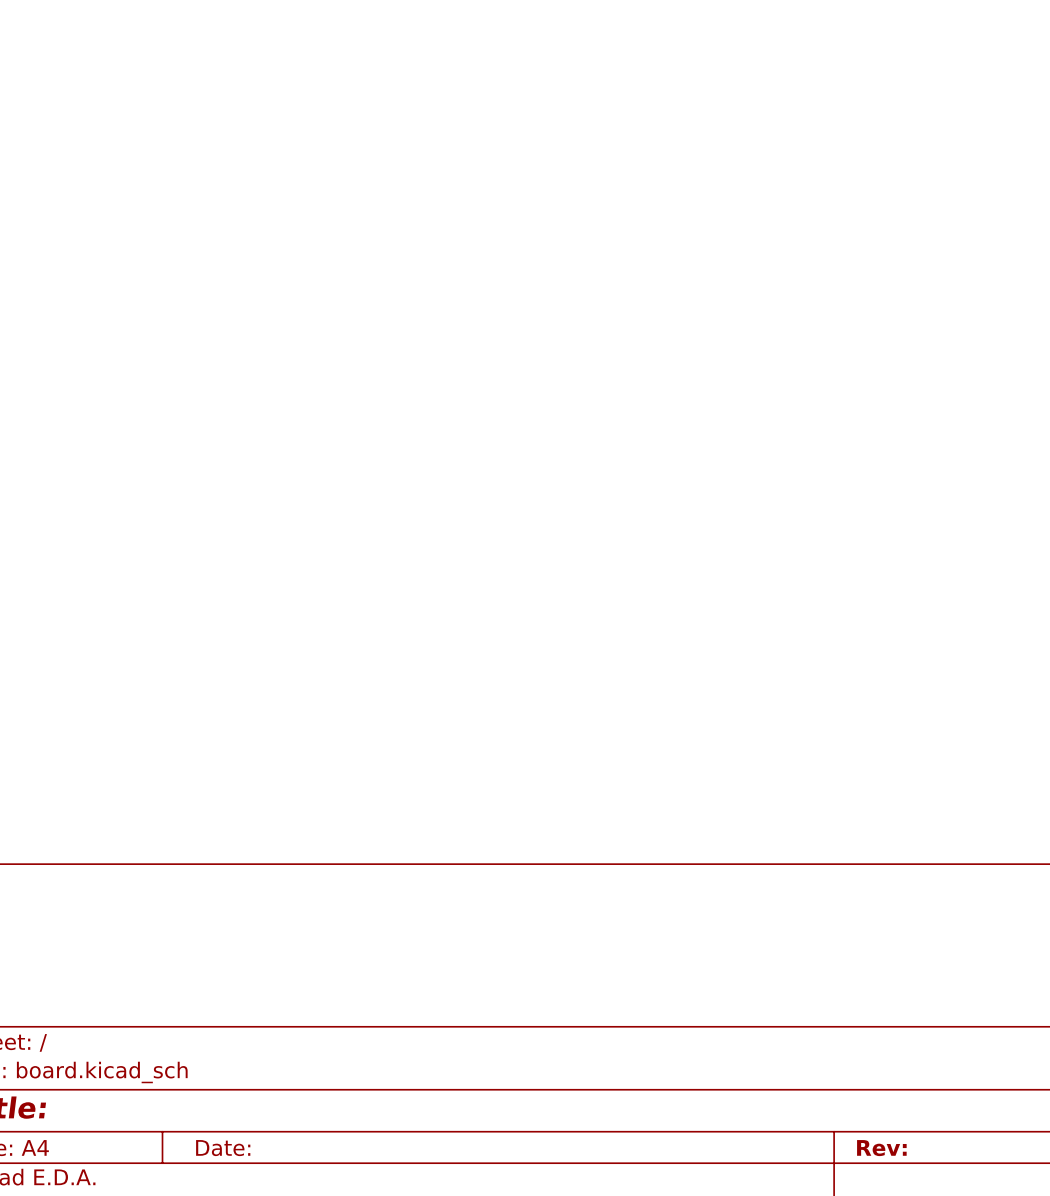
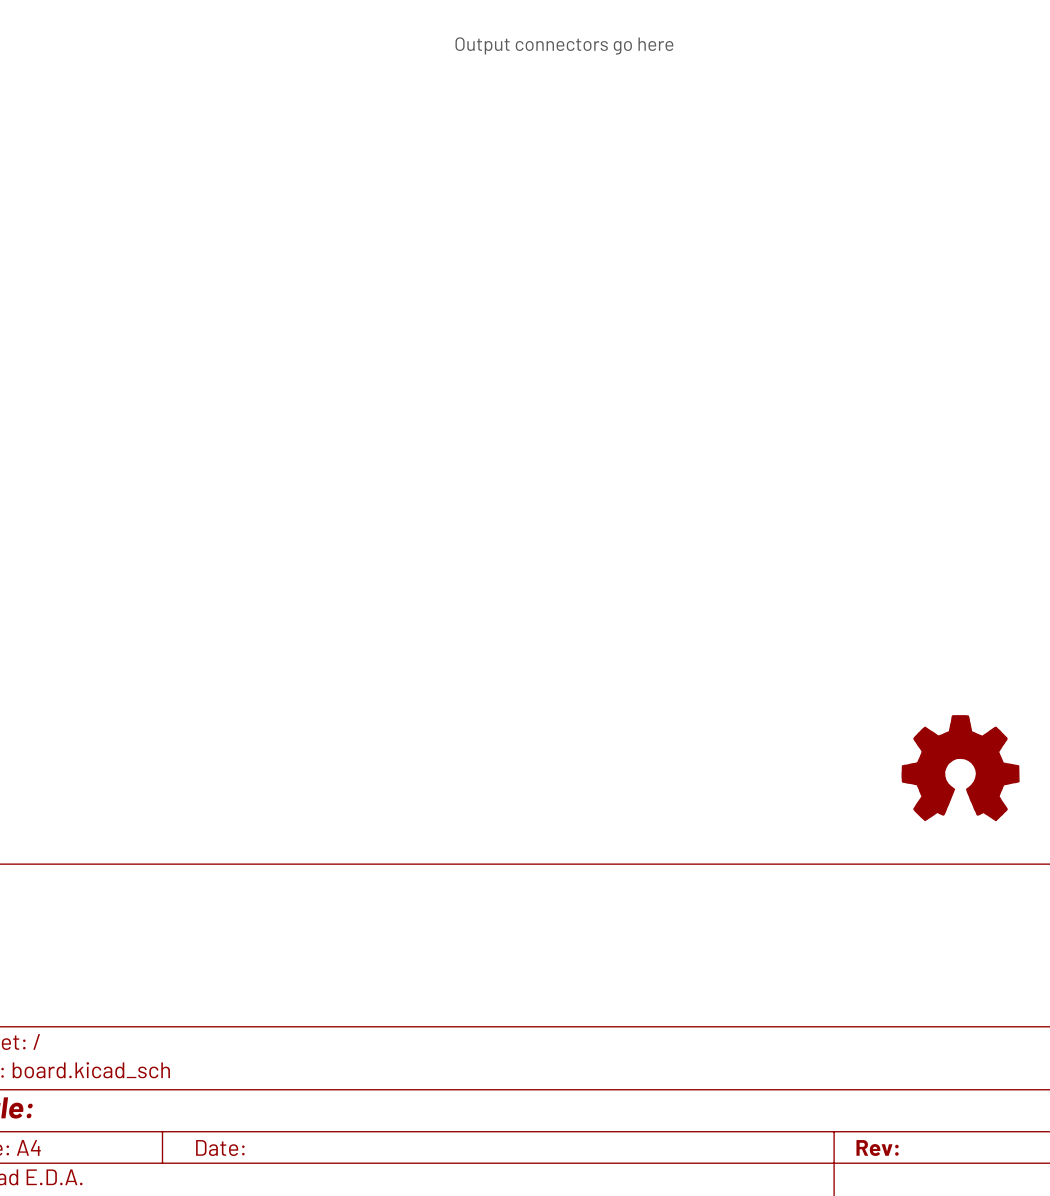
text: none -> Output connectors go here (564, 45)
part: none -> (960, 768)

